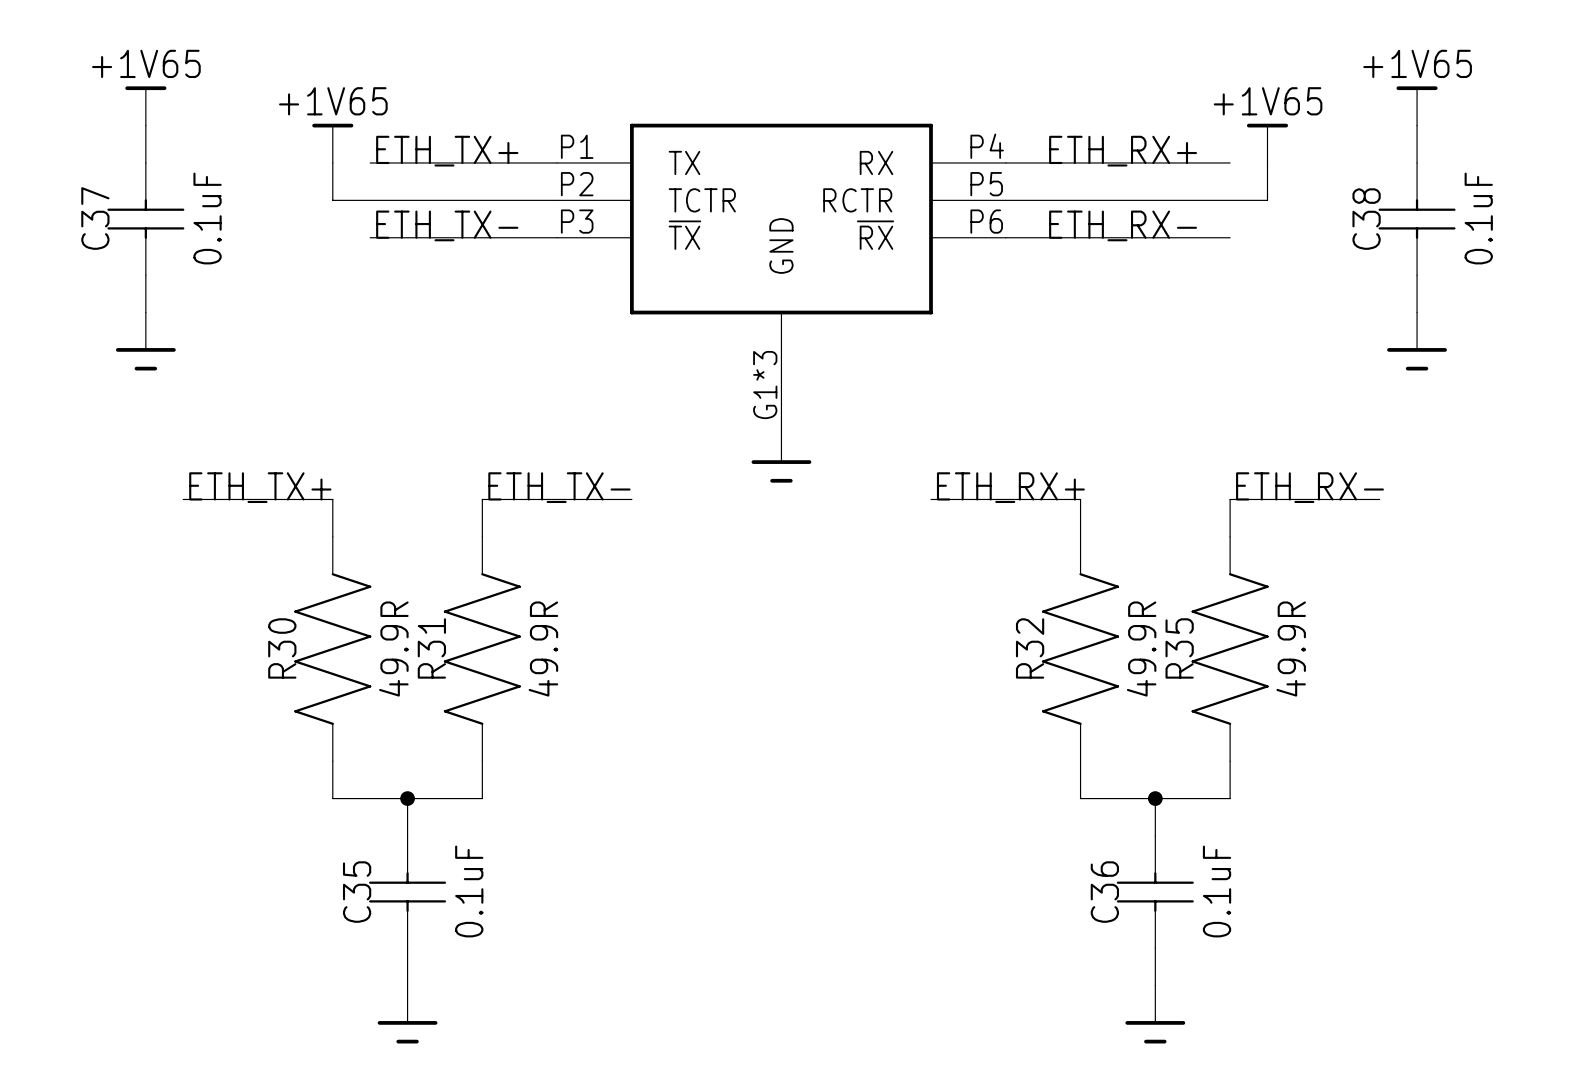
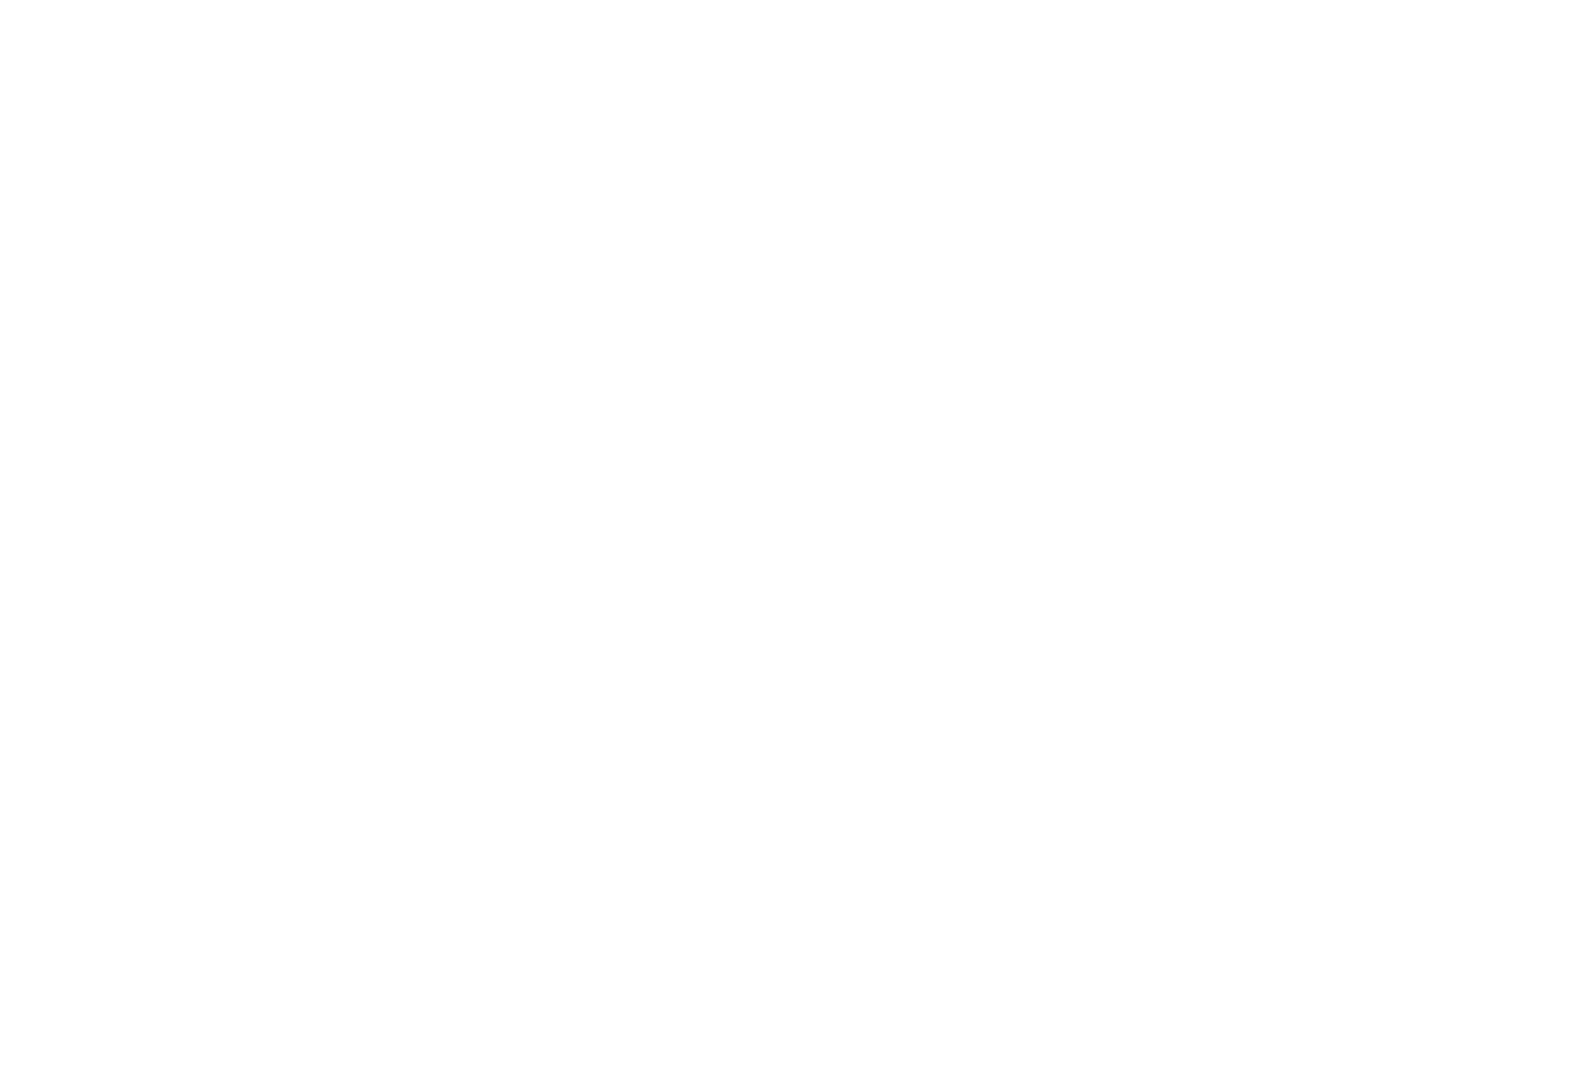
power symbol: +1V65 (145, 105) -> none
power symbol: +1V65 (1417, 105) -> none
wire: (145, 125) (145, 162) -> none
wire: (1417, 125) (1417, 162) -> none
power symbol: +1V65 (332, 143) -> none
power symbol: +1V65 (1267, 143) -> none
label: ETH_TX+ (447, 151) -> none
label: ETH_RX+ (1123, 151) -> none
wire: (332, 162) (332, 200) (557, 200) -> none
wire: (370, 162) (557, 162) -> none
wire: (1005, 162) (1230, 162) -> none
wire: (1267, 162) (1267, 200) (1005, 200) -> none
C37: 0.1uF (145, 219) -> none
C38: 0.1uF (1417, 219) -> none
label: ETH_TX- (447, 225) -> none
label: ETH_RX- (1123, 225) -> none
wire: (370, 237) (557, 237) -> none
wire: (1005, 237) (1230, 237) -> none
part: (781, 255) -> none
wire: (145, 275) (145, 312) -> none
wire: (1417, 275) (1417, 312) -> none
power symbol: (145, 341) -> none
power symbol: (1417, 341) -> none
wire: (781, 387) (781, 424) -> none
power symbol: (781, 453) -> none
label: ETH_TX+ (260, 487) -> none
label: ETH_TX- (559, 487) -> none
label: ETH_RX+ (1010, 487) -> none
label: ETH_RX- (1309, 487) -> none
wire: (183, 499) (332, 499) (332, 536) -> none
wire: (631, 499) (482, 499) (482, 536) -> none
wire: (931, 499) (1080, 499) (1080, 536) -> none
wire: (1379, 499) (1230, 499) (1230, 536) -> none
R30: 49.9R (332, 649) -> none
R31: 49.9R (482, 649) -> none
R32: 49.9R (1080, 649) -> none
R35: 49.9R (1230, 649) -> none
wire: (332, 761) (332, 798) (482, 798) (482, 761) -> none
wire: (1080, 761) (1080, 798) (1230, 798) (1230, 761) -> none
wire: (407, 798) (407, 835) -> none
junction: (407, 798) -> none
wire: (1155, 798) (1155, 835) -> none
junction: (1155, 798) -> none
C35: 0.1uF (407, 892) -> none
C36: 0.1uF (1155, 892) -> none
wire: (407, 948) (407, 985) -> none
wire: (1155, 948) (1155, 985) -> none
power symbol: (407, 1014) -> none
power symbol: (1155, 1014) -> none

